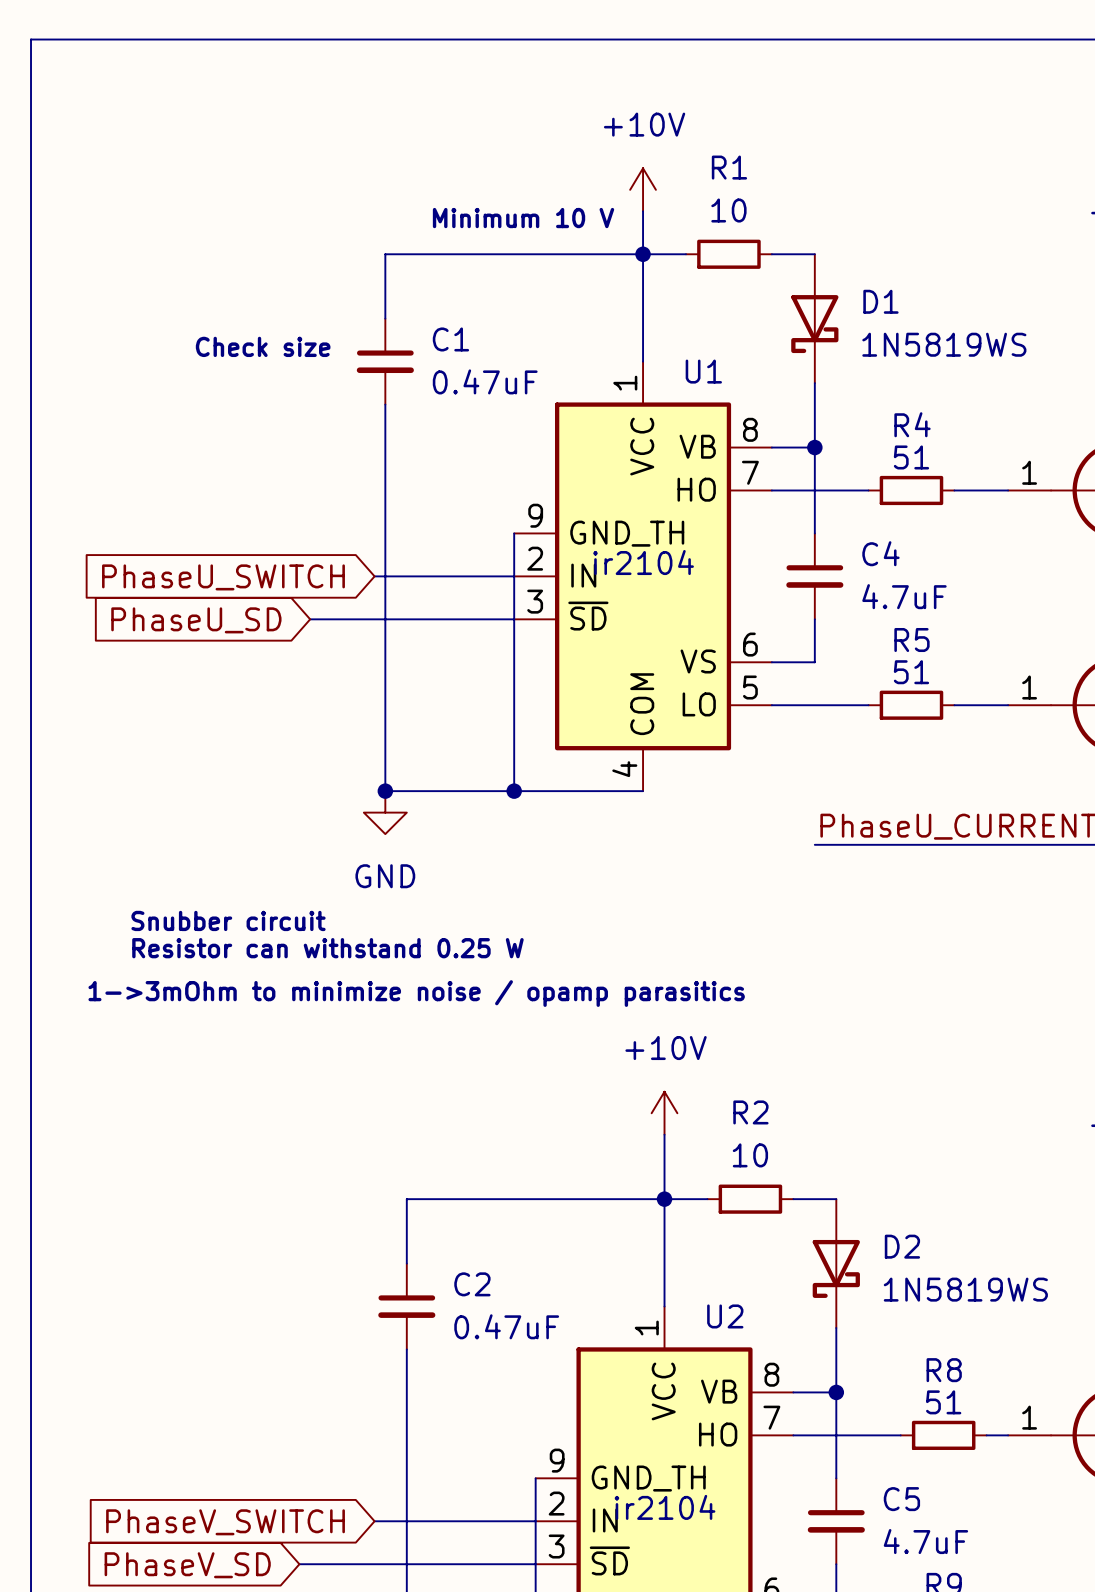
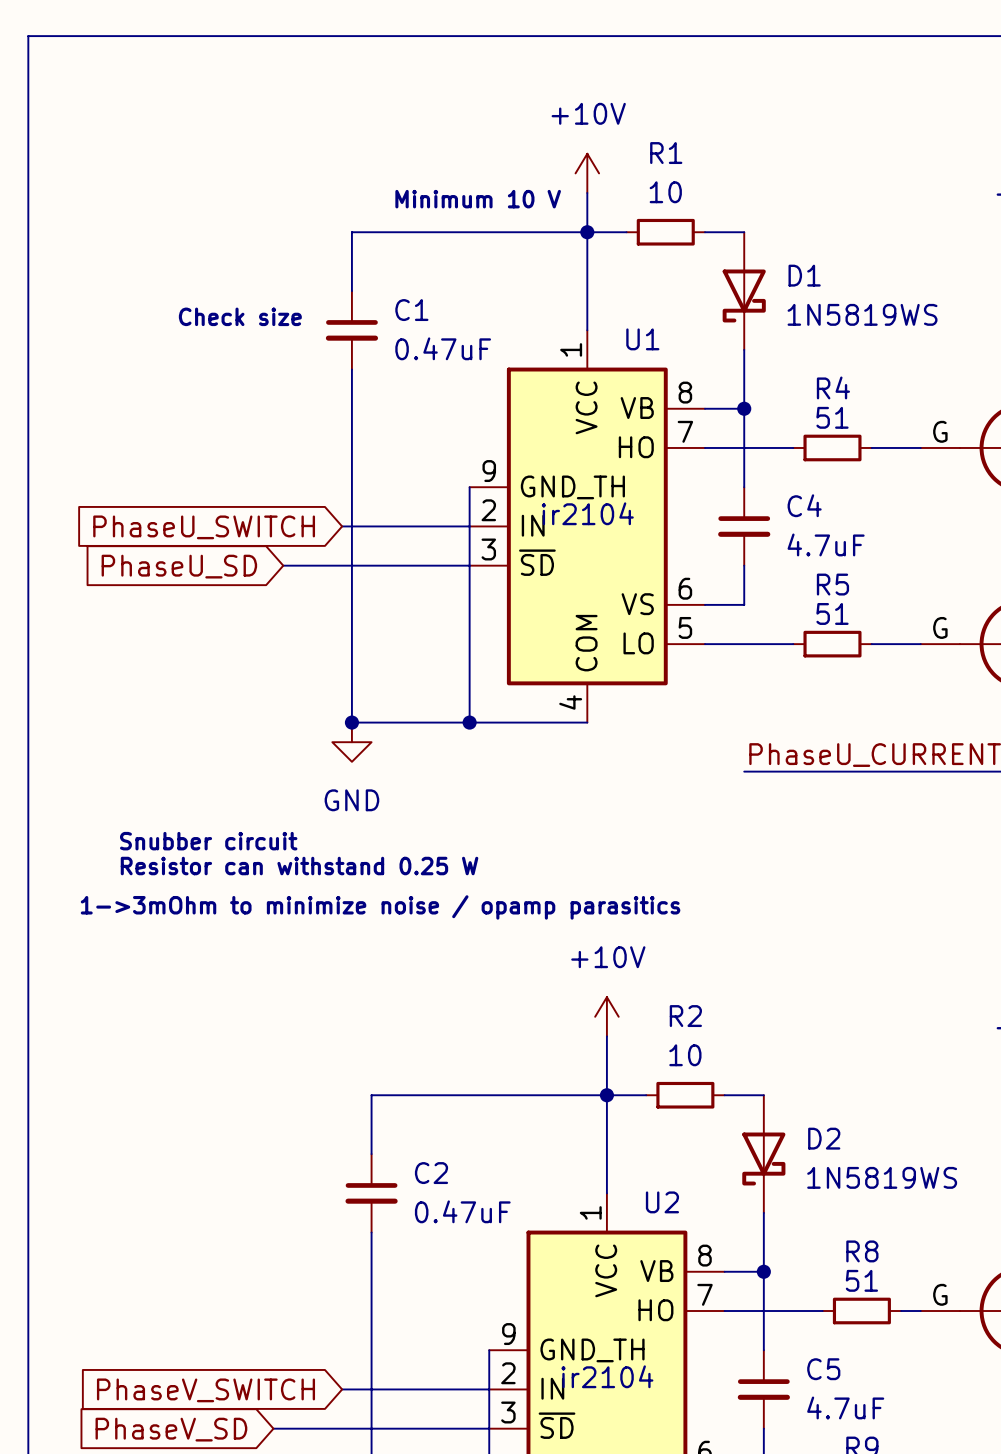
part pin name: none -> G (940, 431)
part pin number: 1 (1029, 472) -> none
part pin name: none -> G (940, 627)
part pin number: 1 (1029, 687) -> none
part pin name: none -> G (940, 1294)
part pin number: 1 (1029, 1417) -> none

